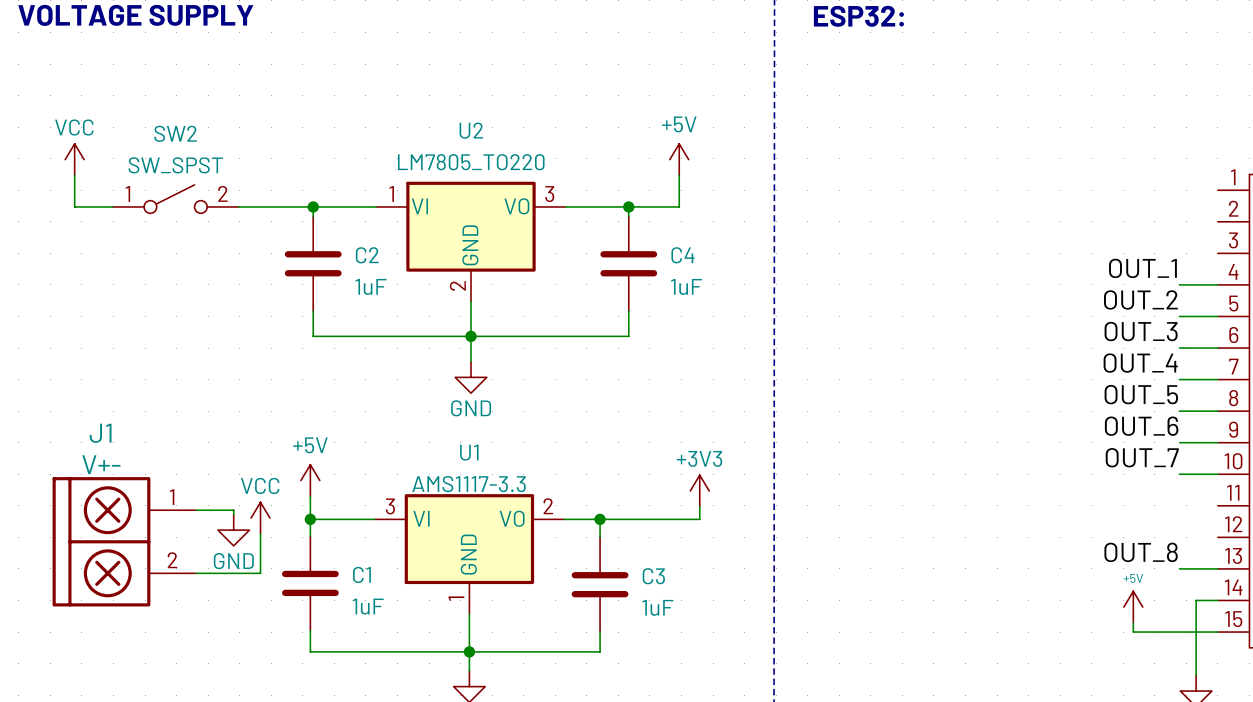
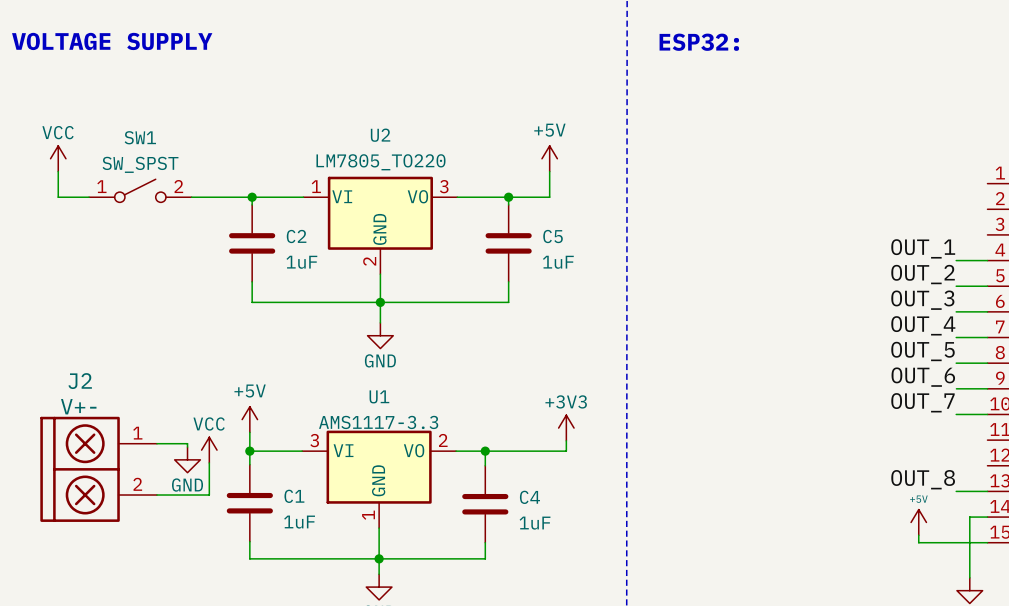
SW2 name: SW2 (175, 133) -> SW1 (140, 137)
C4 name: C4 (682, 255) -> C5 (553, 236)
J1 name: J1 (100, 433) -> J2 (80, 381)
C3 name: C3 (653, 576) -> C4 (529, 497)

